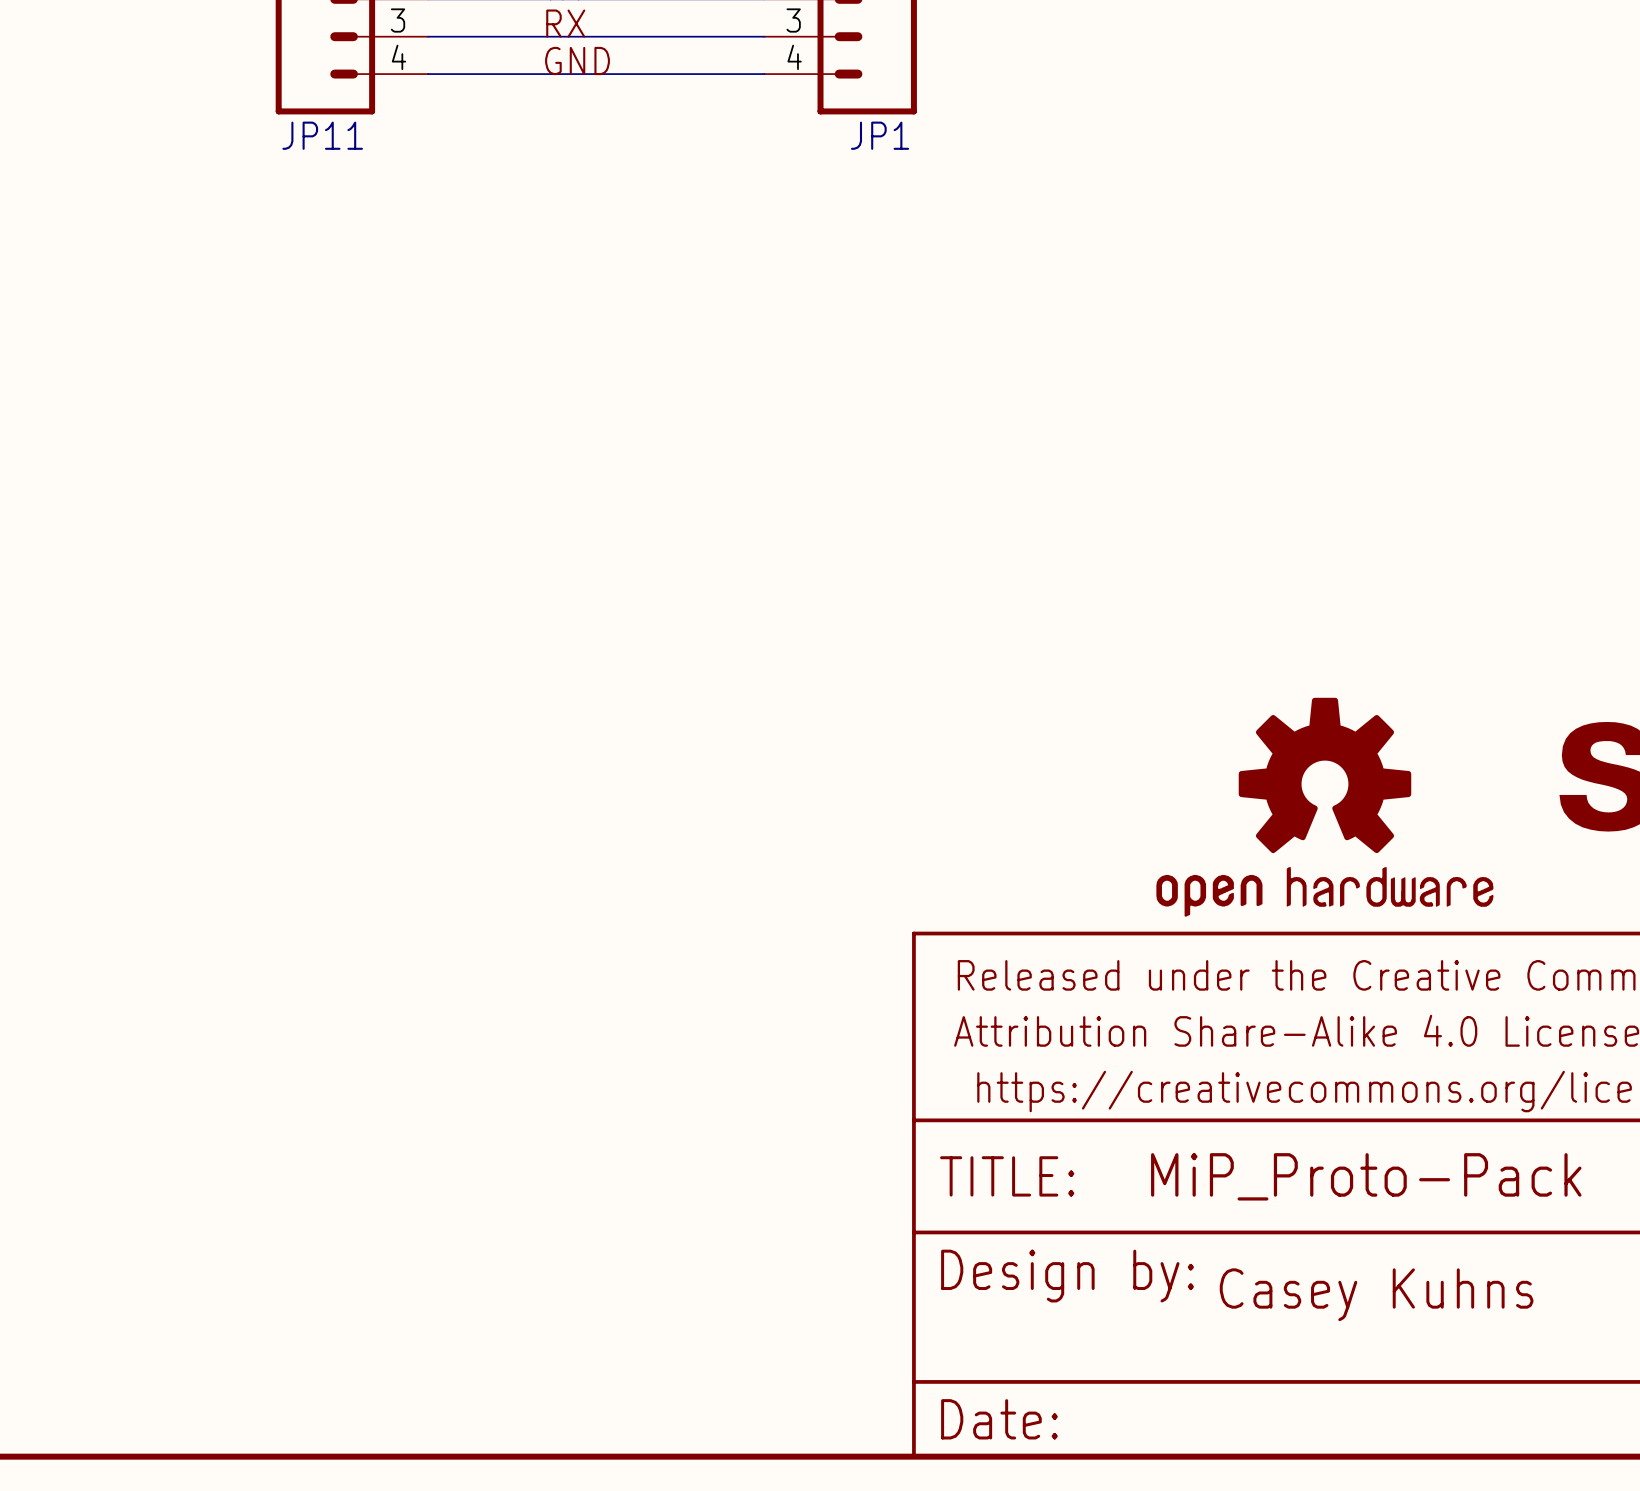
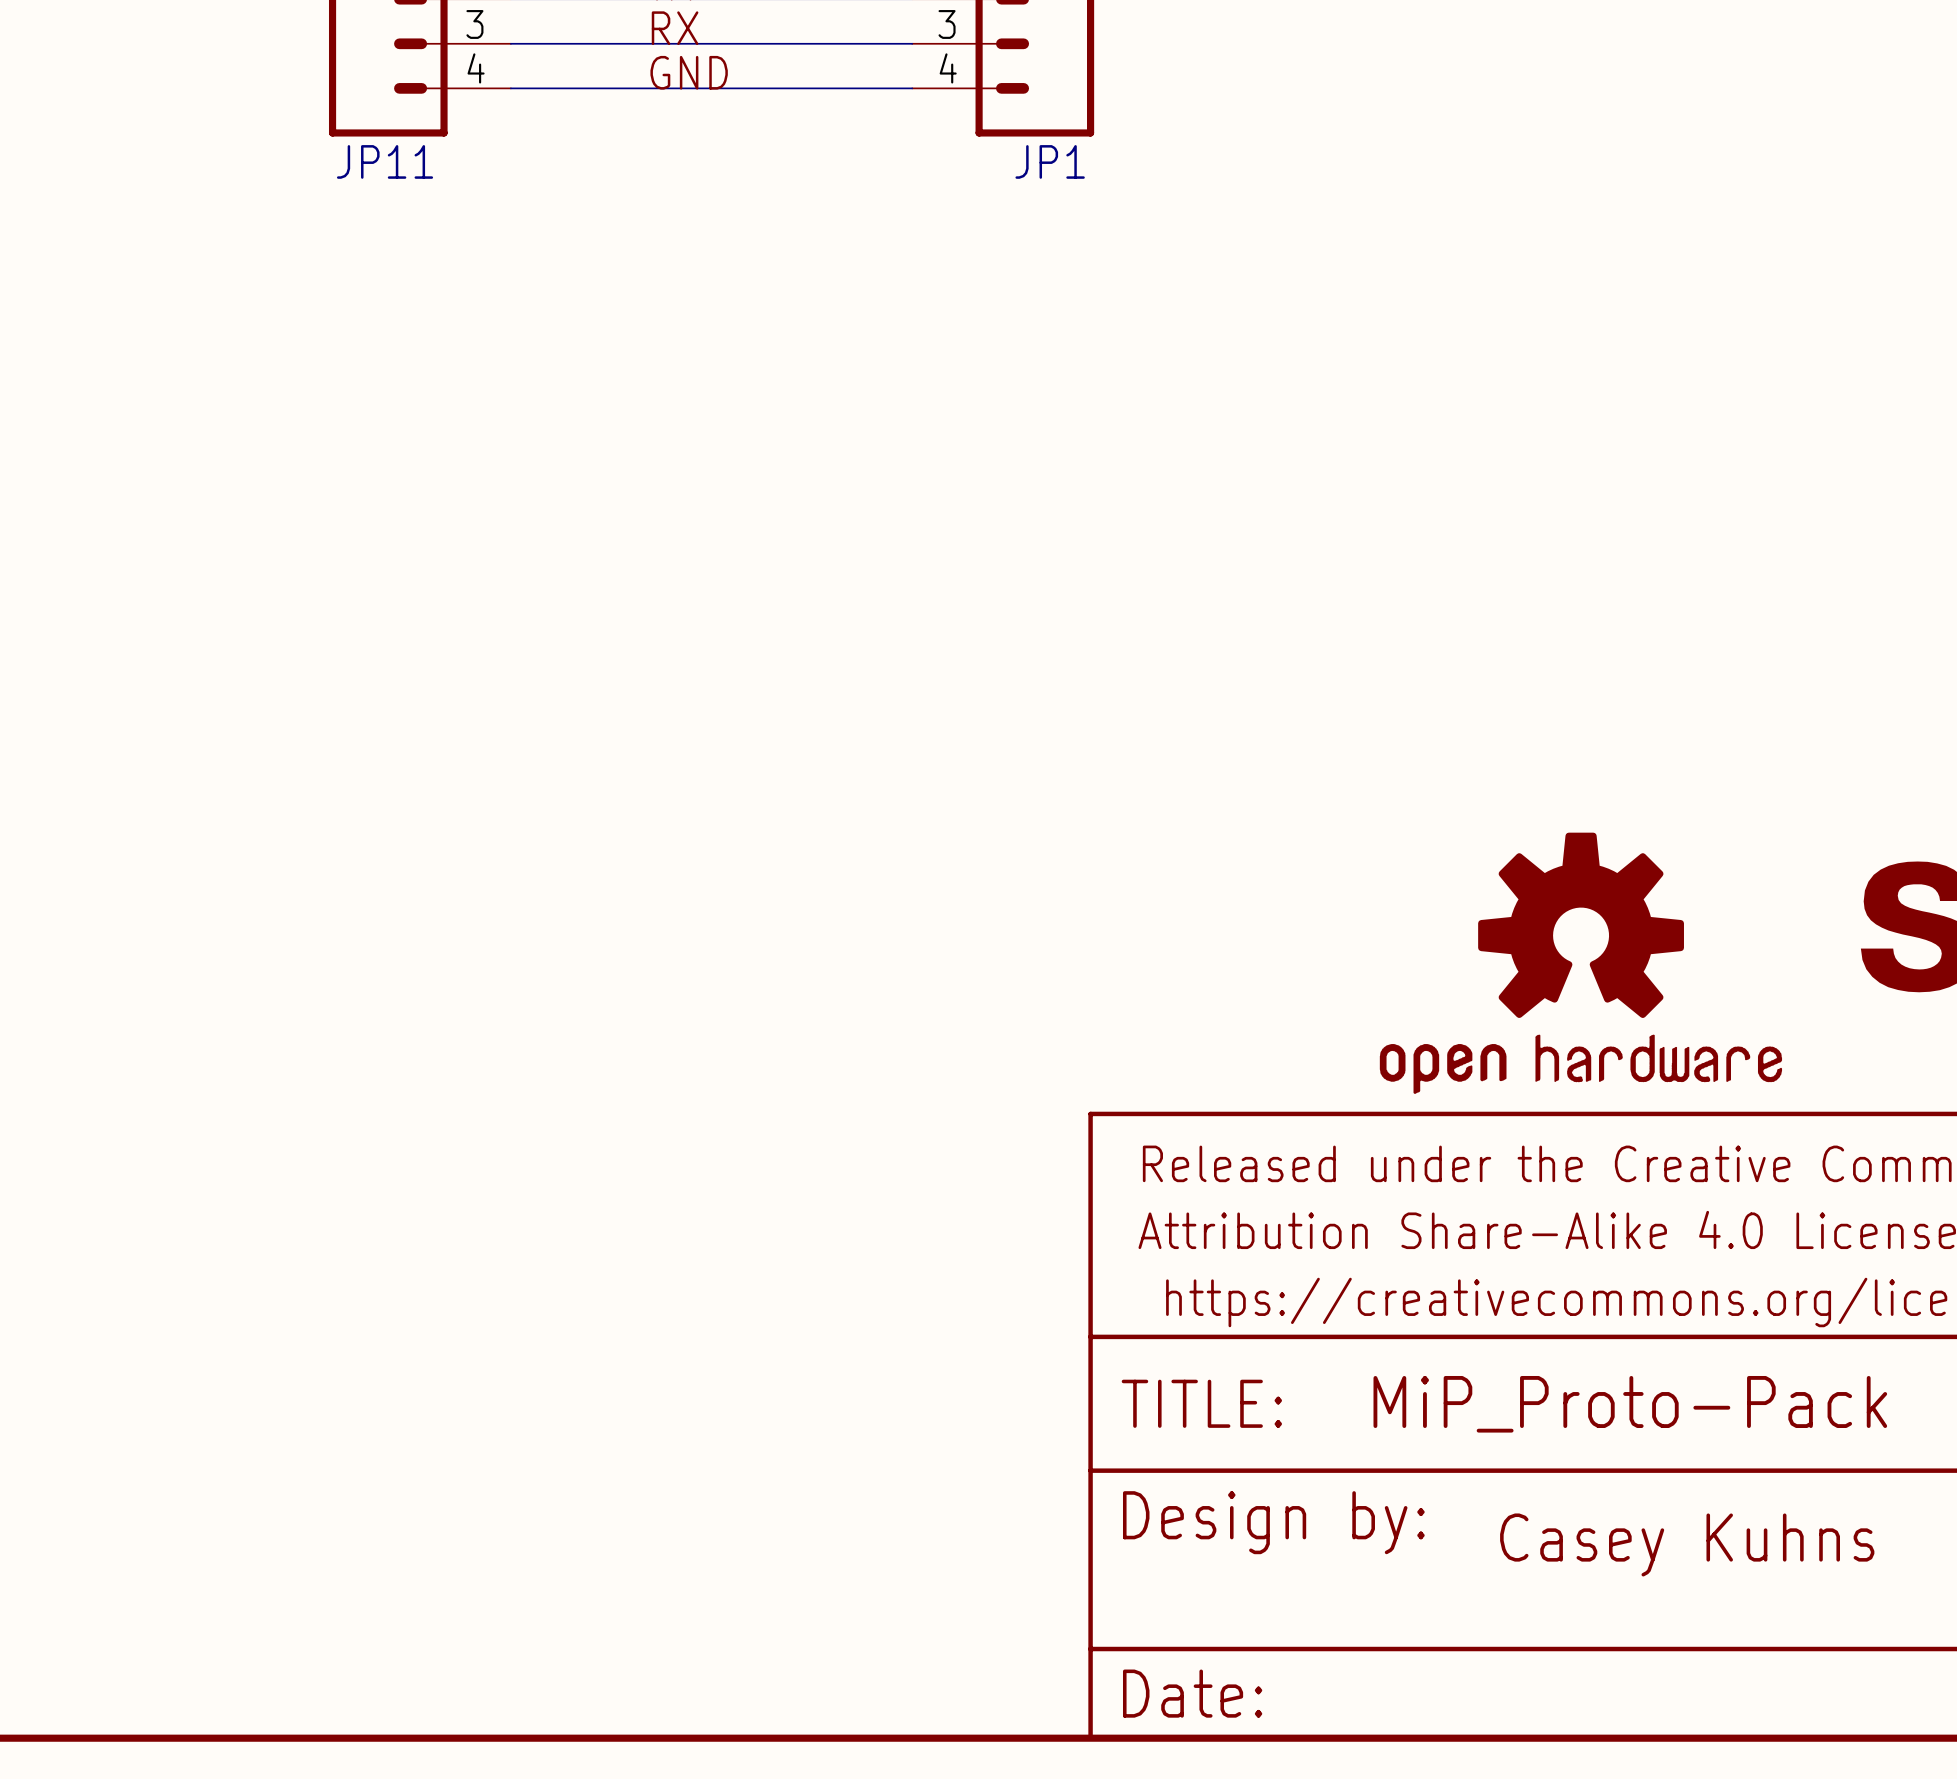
text position: Casey Kuhns (1376, 1294) -> Casey Kuhns (1687, 1544)

